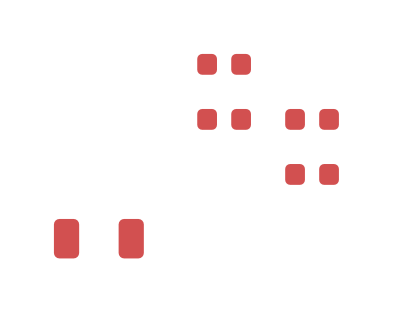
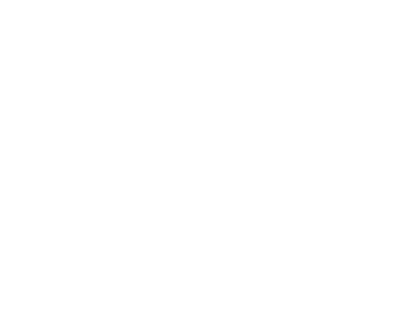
part: (224, 64) -> none
part: (224, 119) -> none
part: (312, 119) -> none
part: (312, 174) -> none
part: (98, 238) -> none

